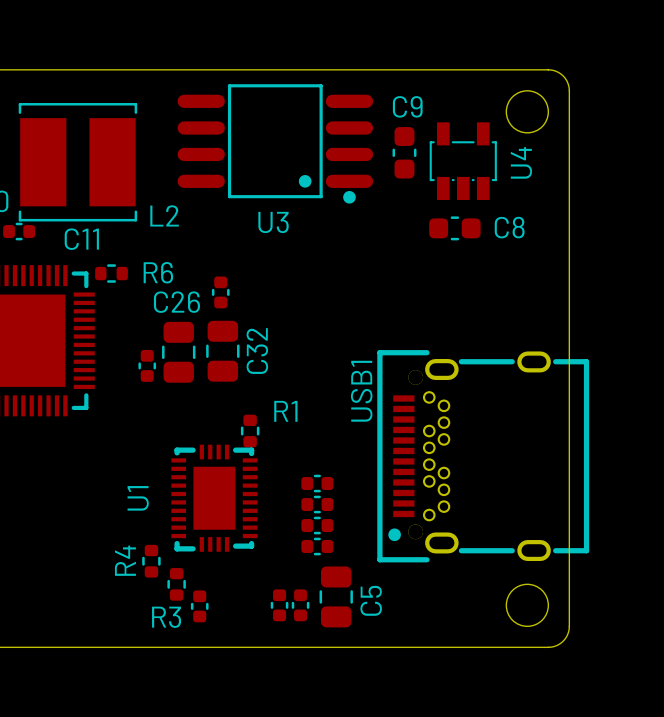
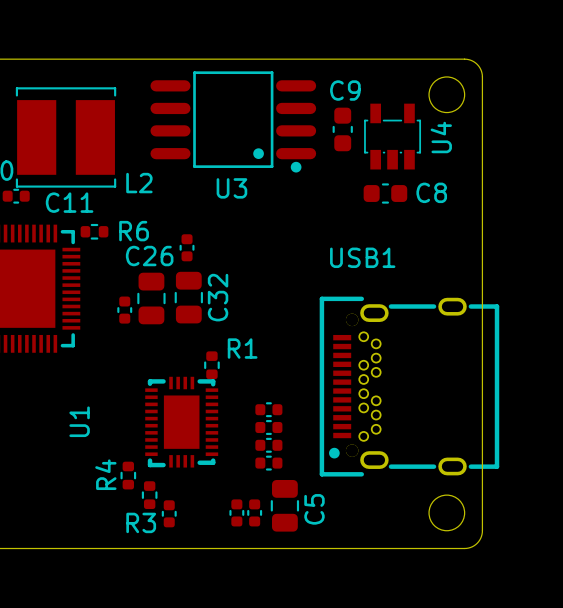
USB1 name rotation: 0° (361, 391) -> 90° clockwise (362, 257)
USB1 name position: USB1 (361, 391) -> USB1 (362, 257)
U1 name position: U1 (138, 498) -> U1 (79, 421)

